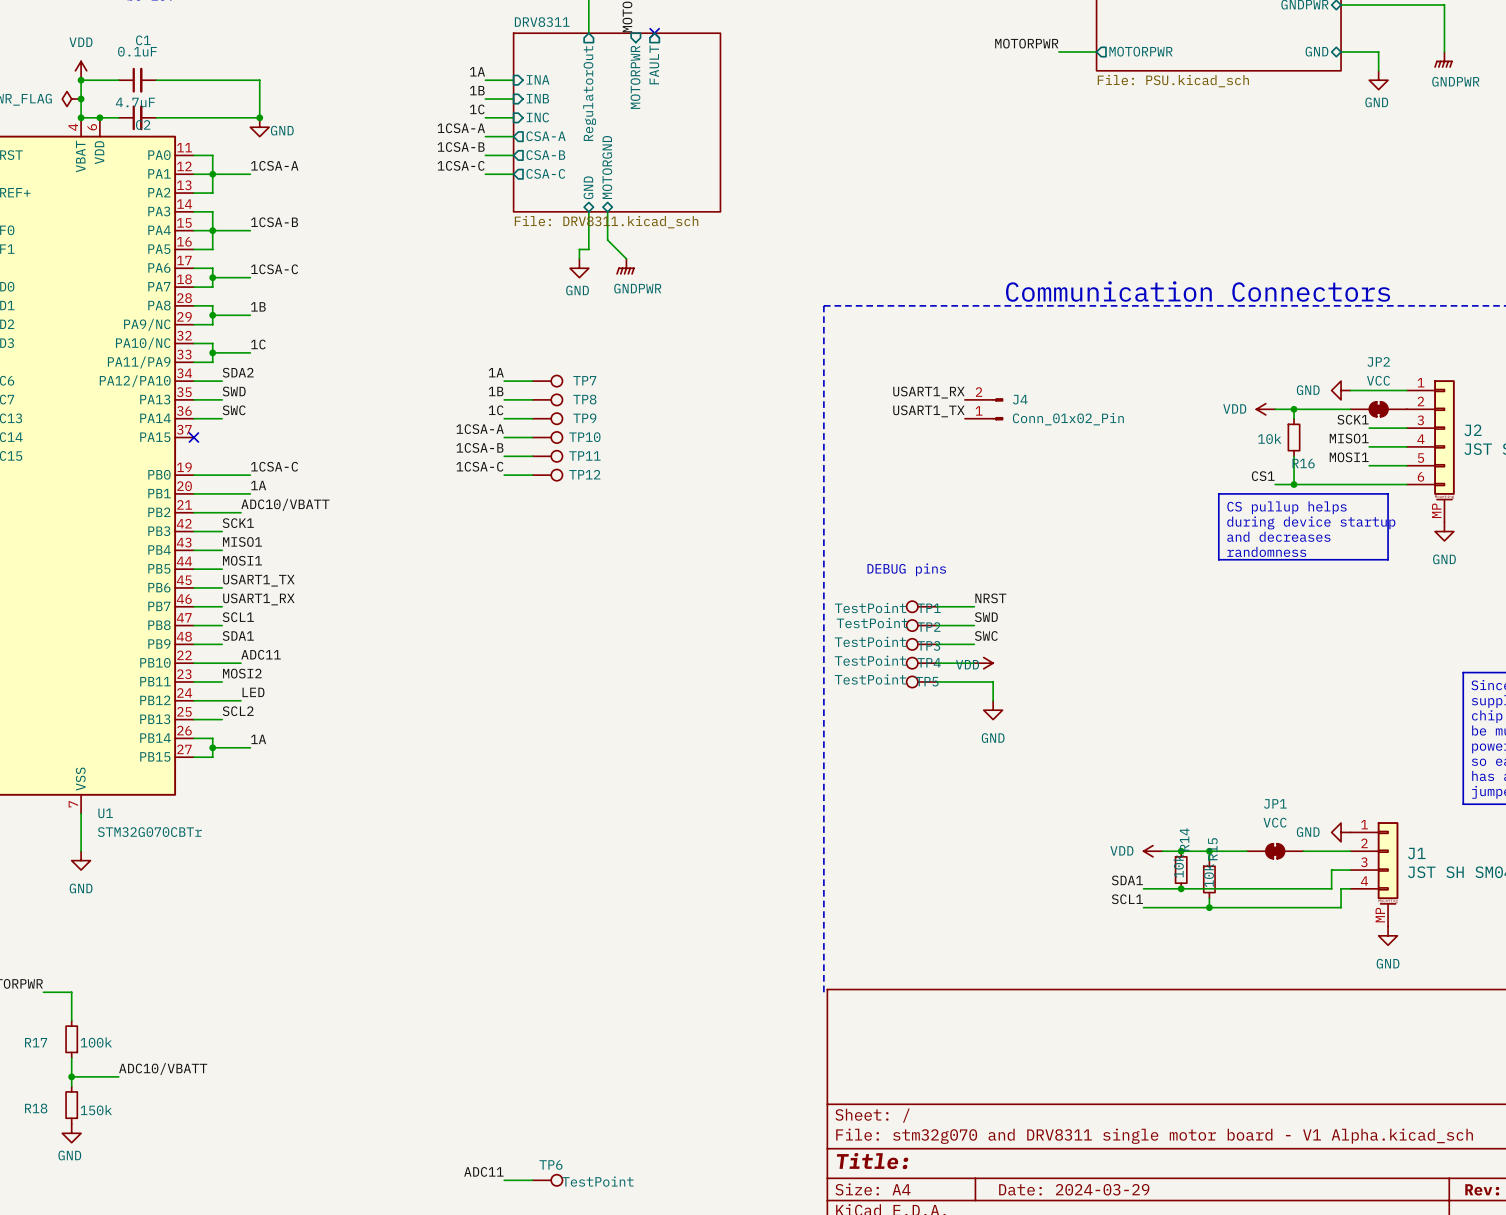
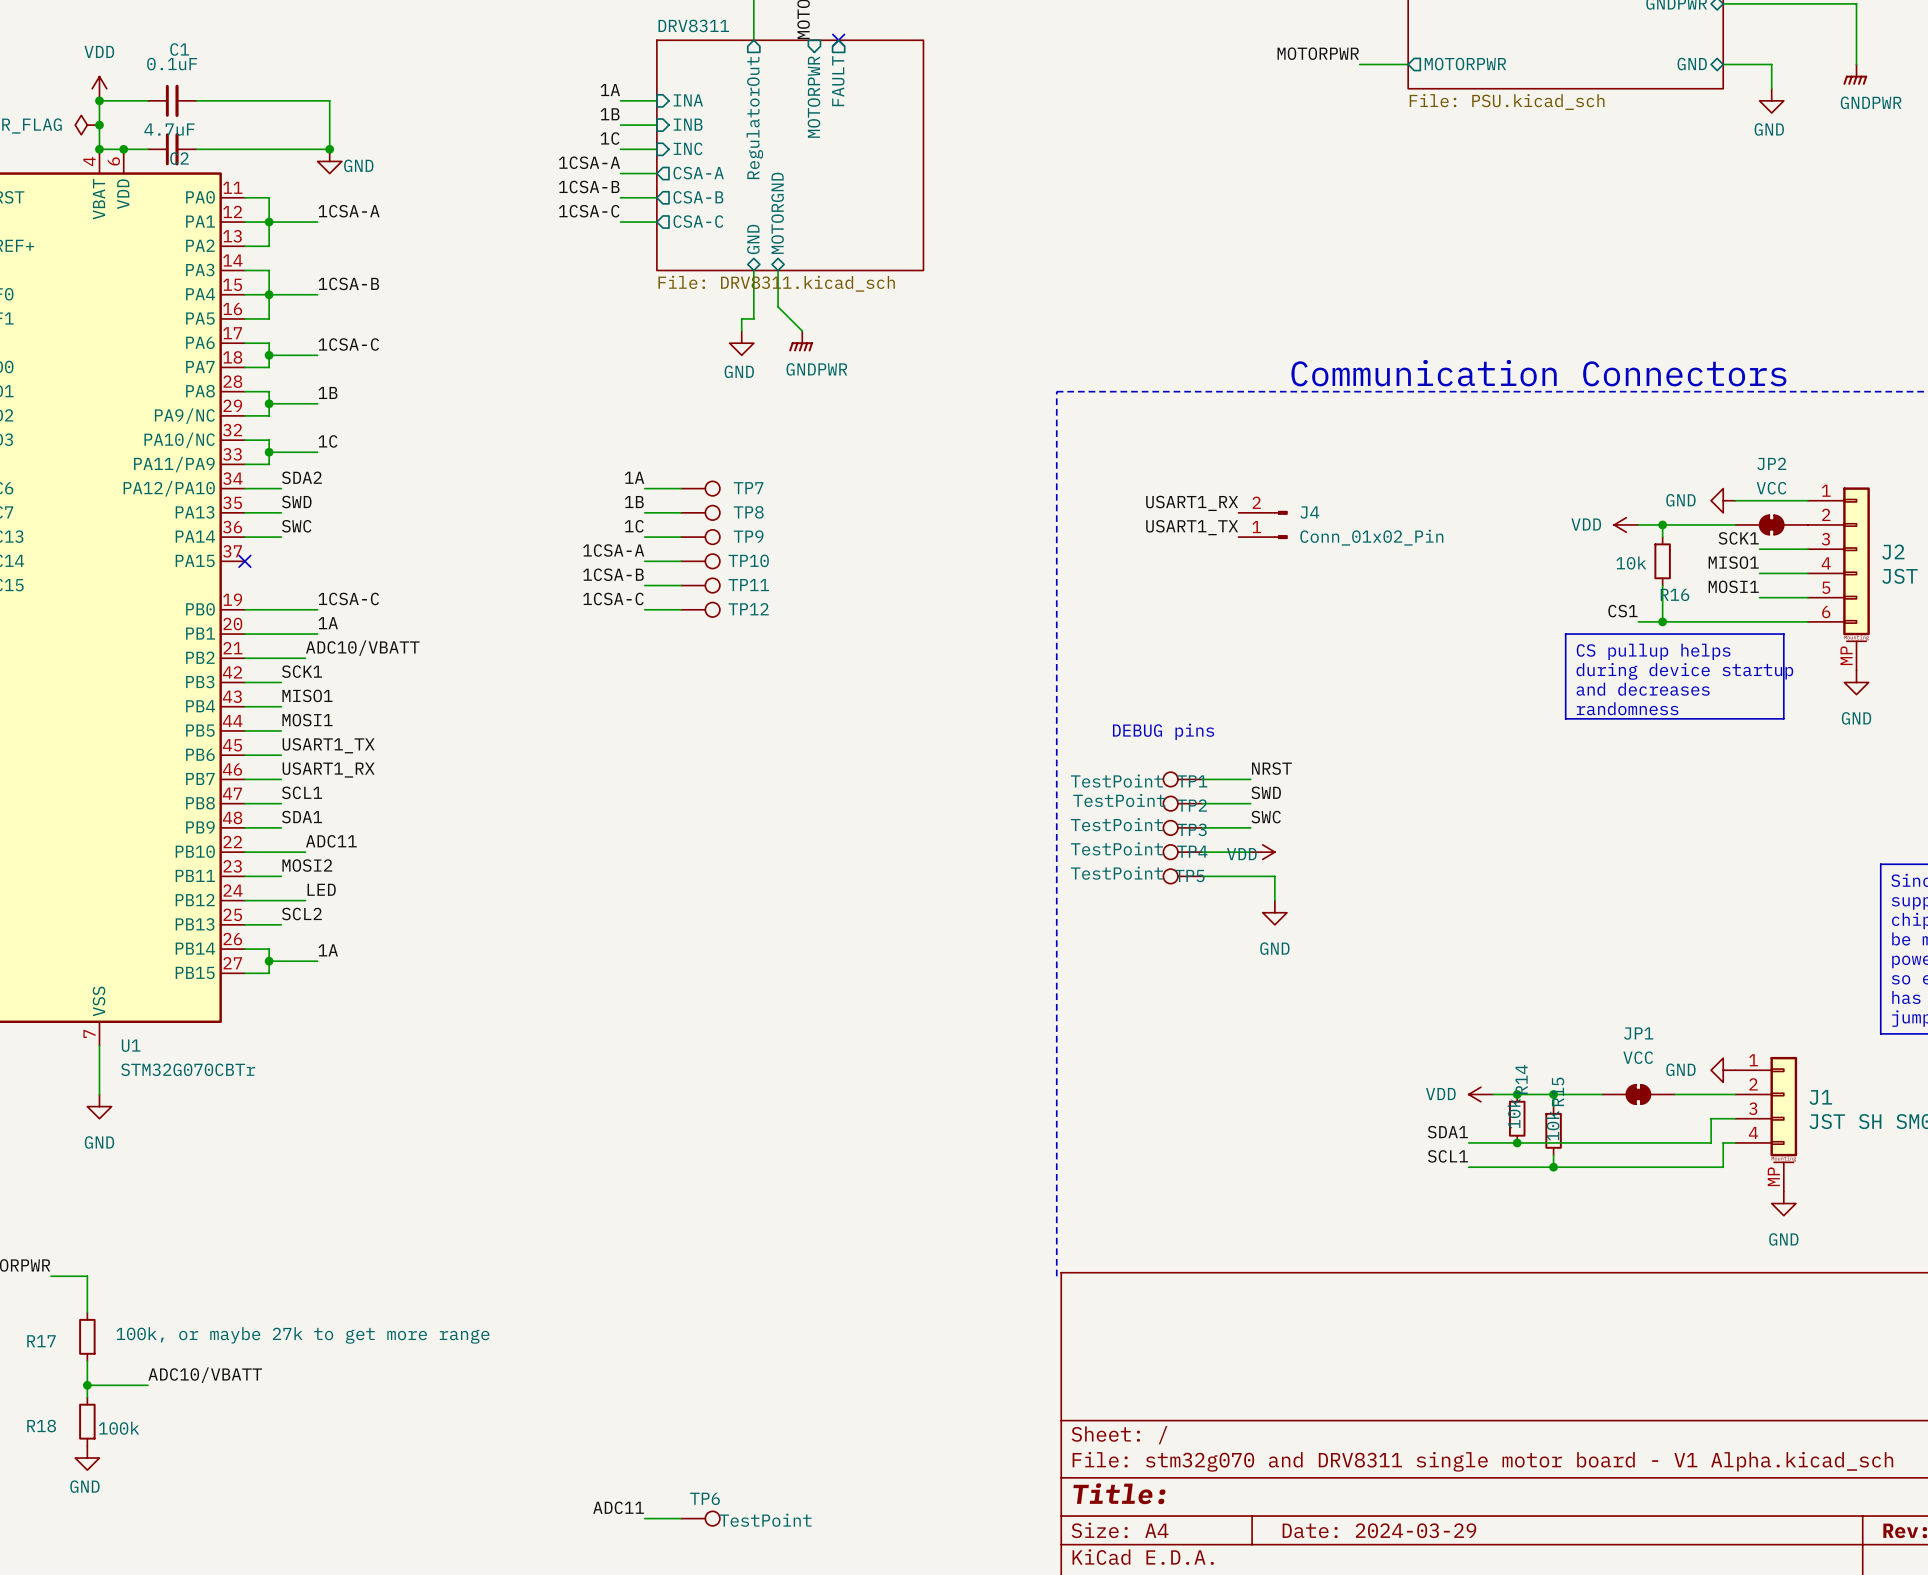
R17 value: 100k (96, 1042) -> 100k, or maybe 27k to get more range (302, 1335)
R18 value: 150k (96, 1110) -> 100k (119, 1428)

